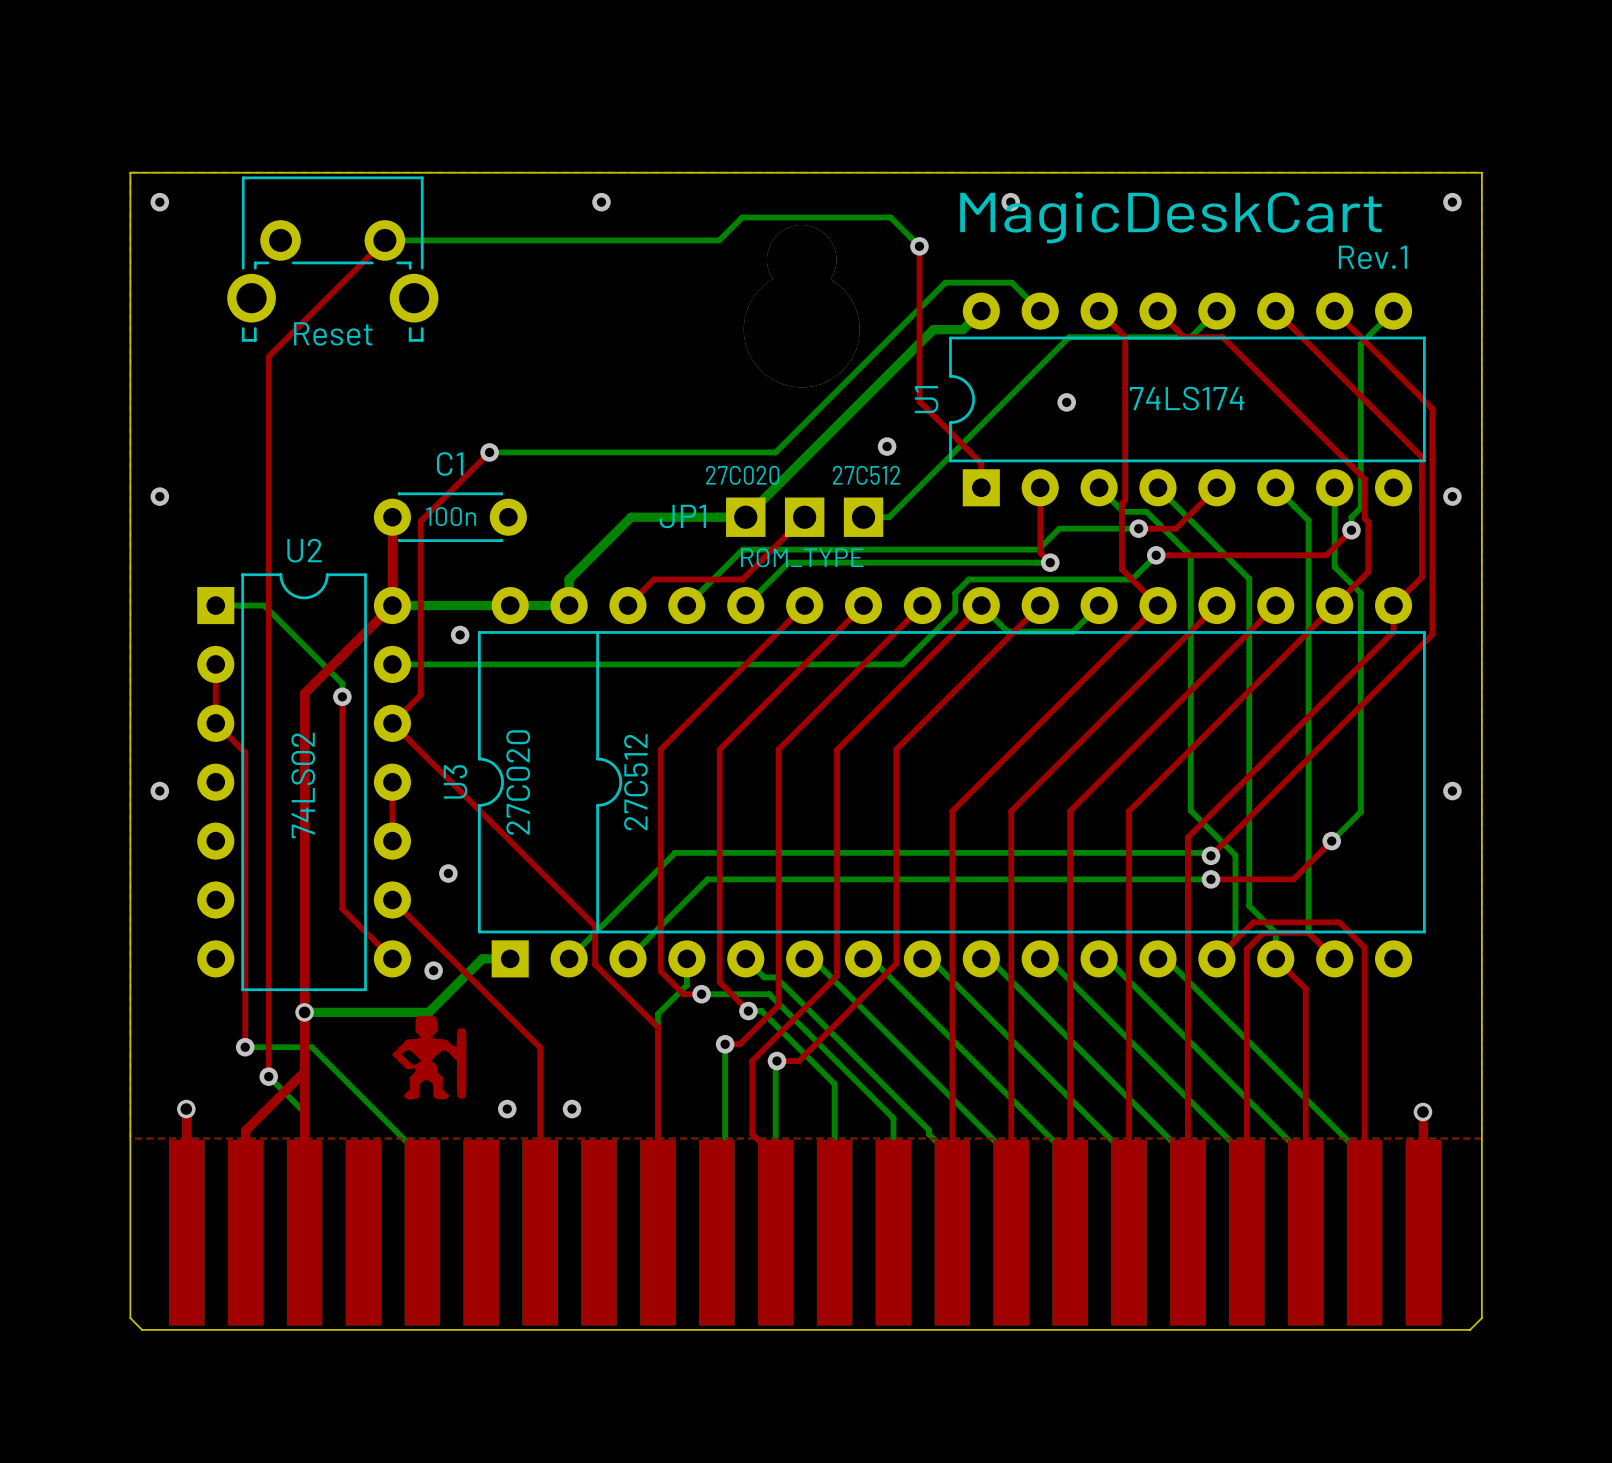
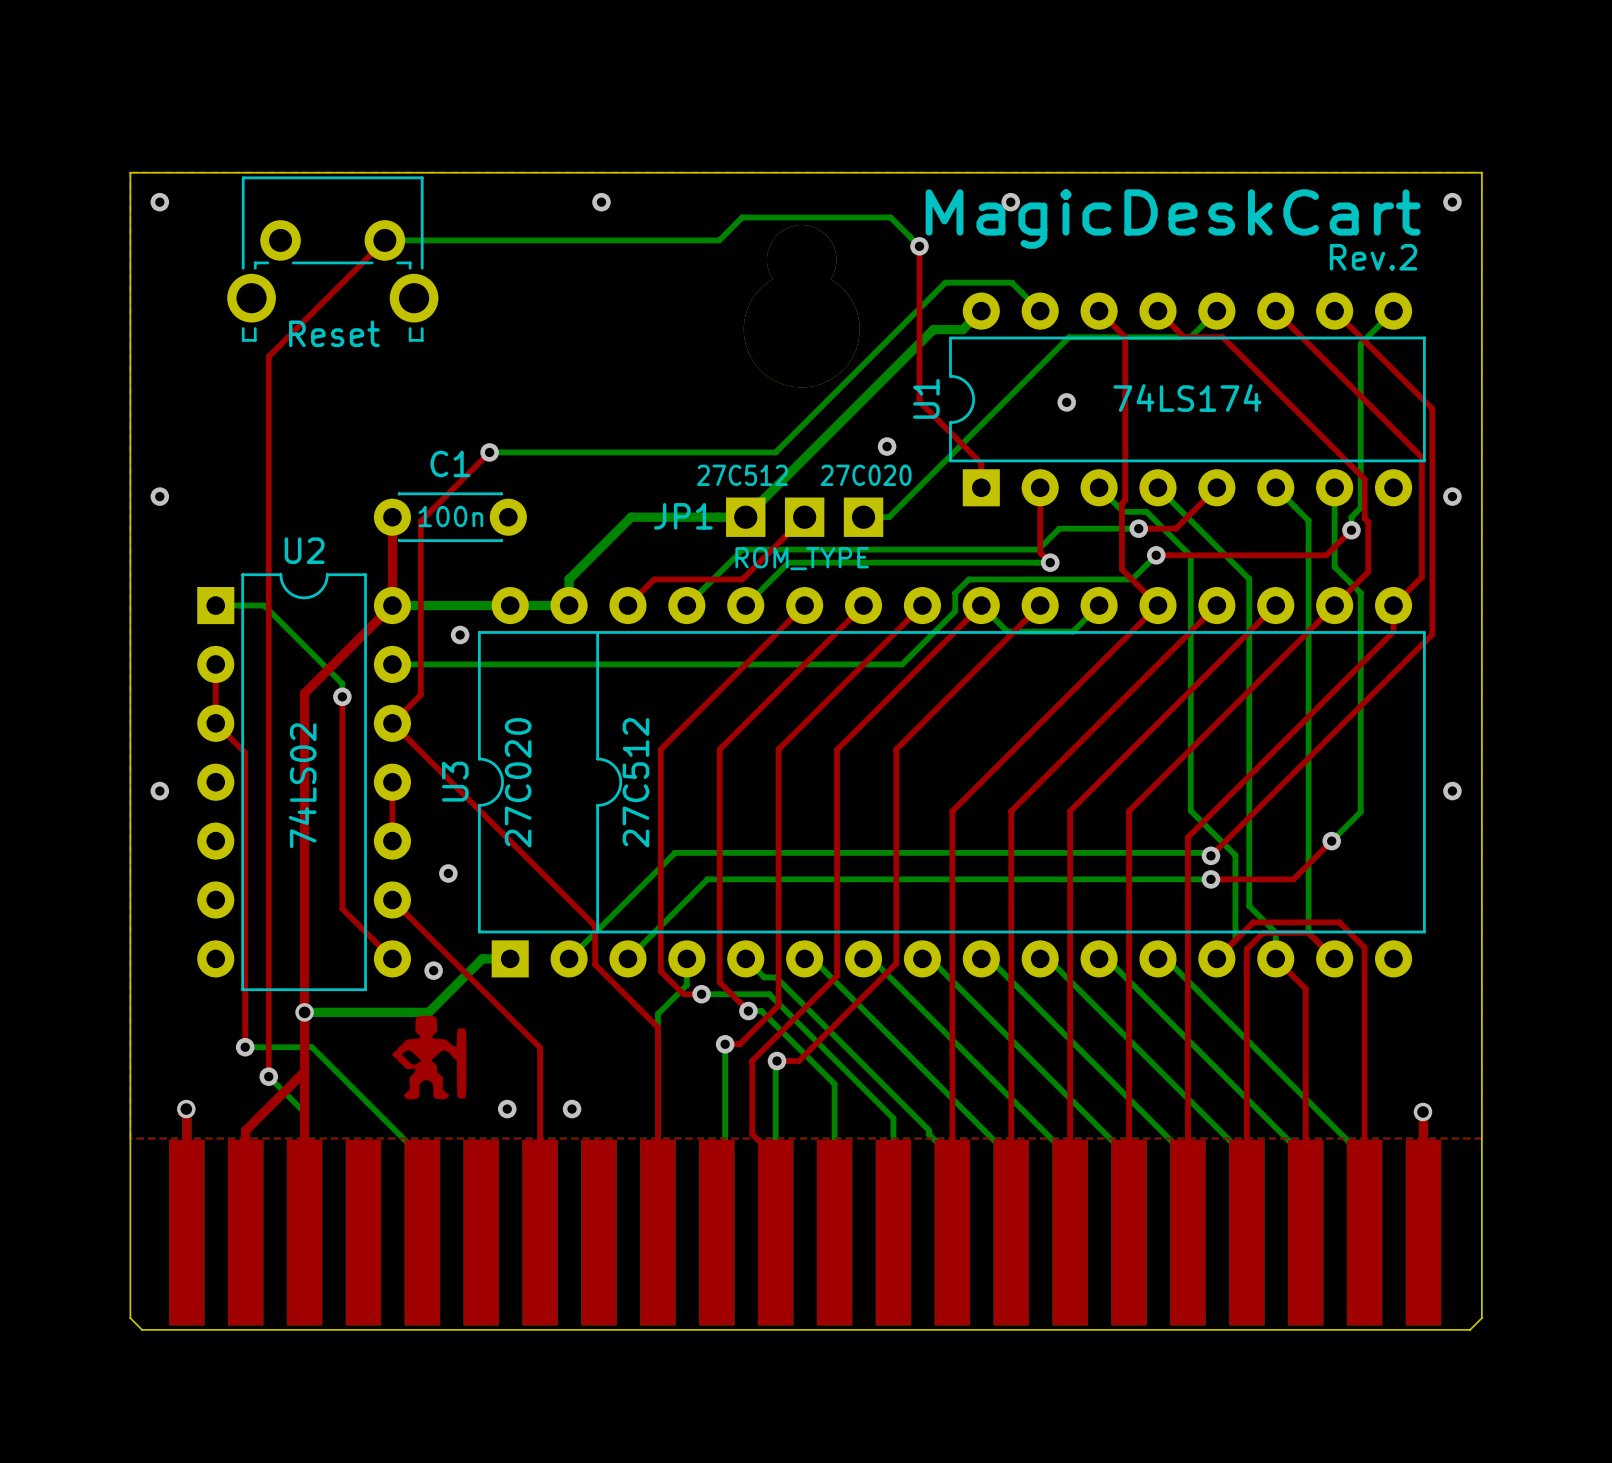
text: Rev.1 (1372, 257) -> Rev.2 (1373, 257)
text: 27C020 (742, 475) -> 27C512 (742, 475)
text: 27C512 (866, 475) -> 27C020 (866, 475)

